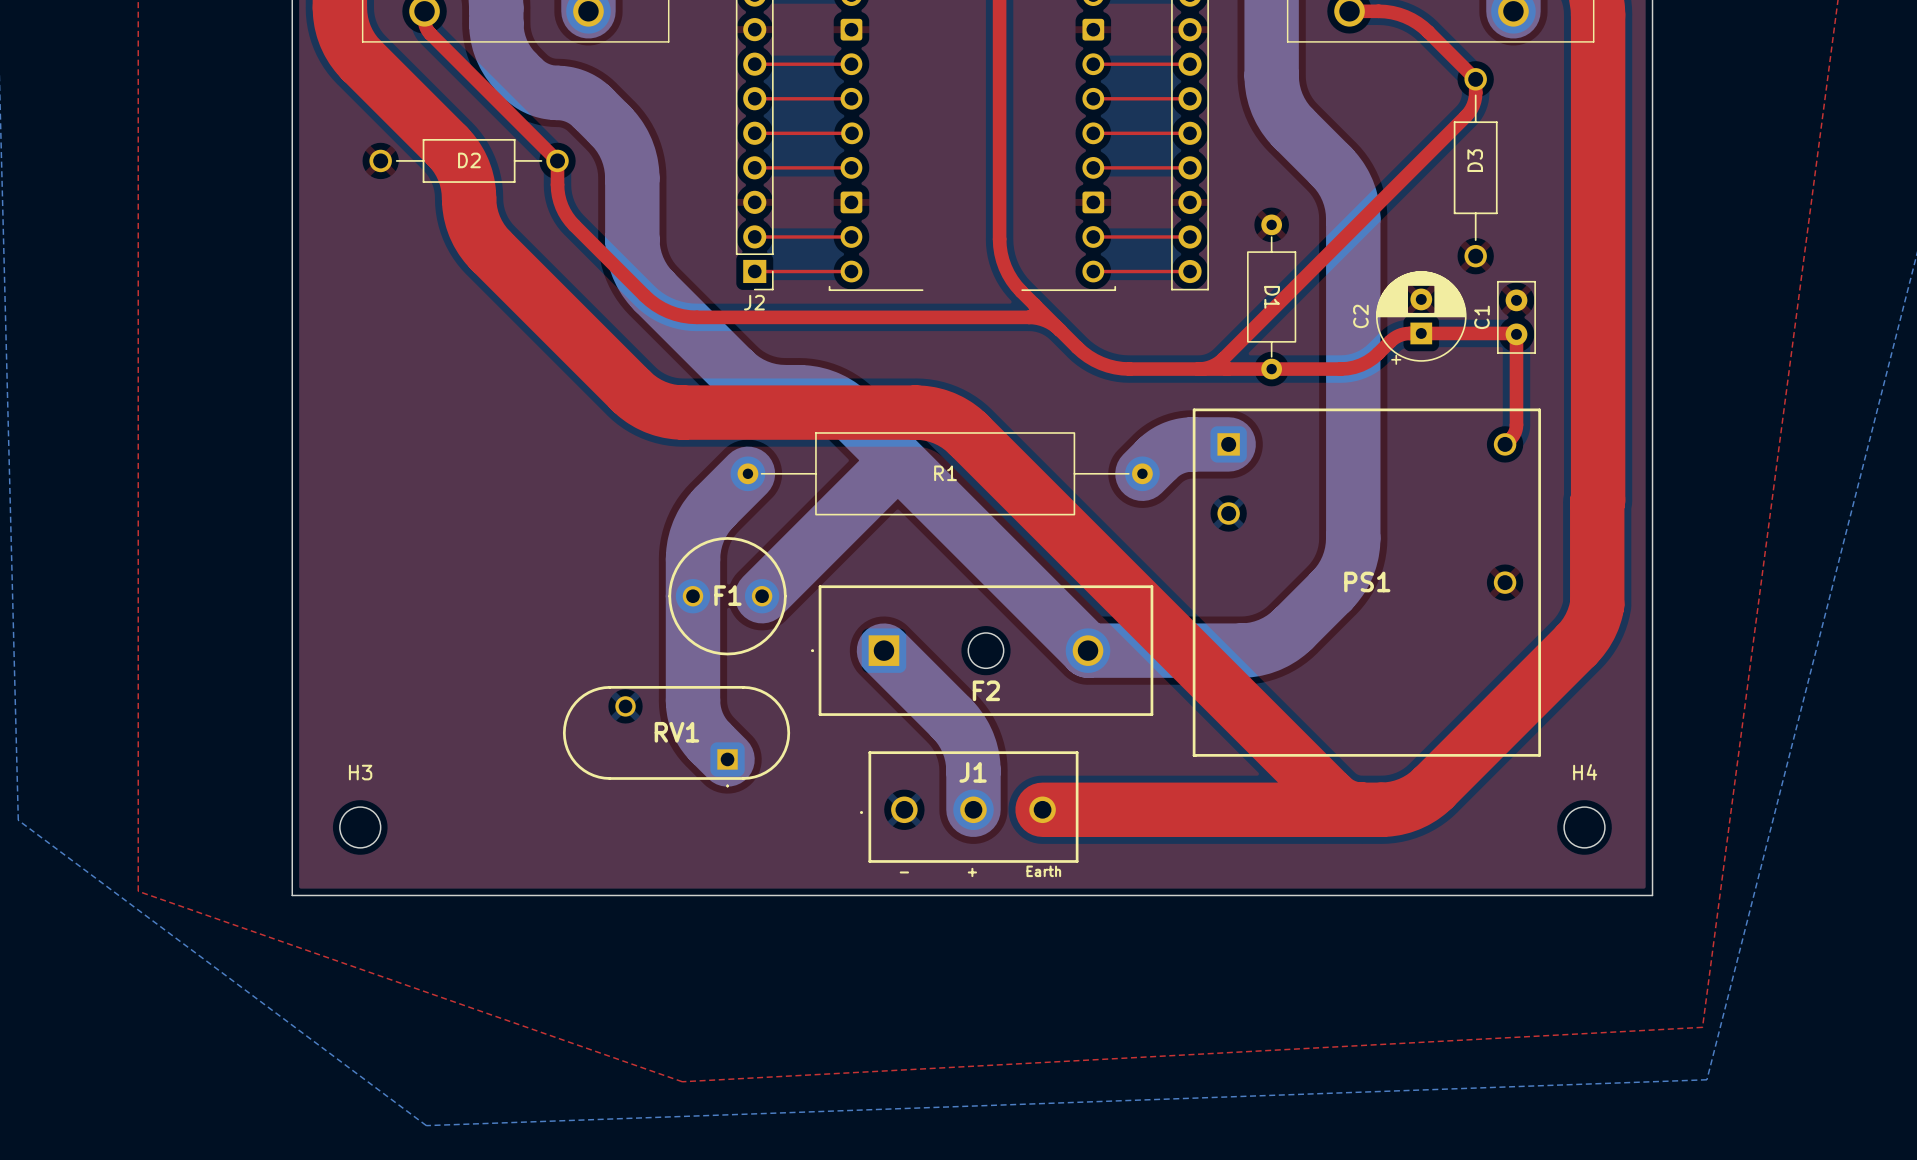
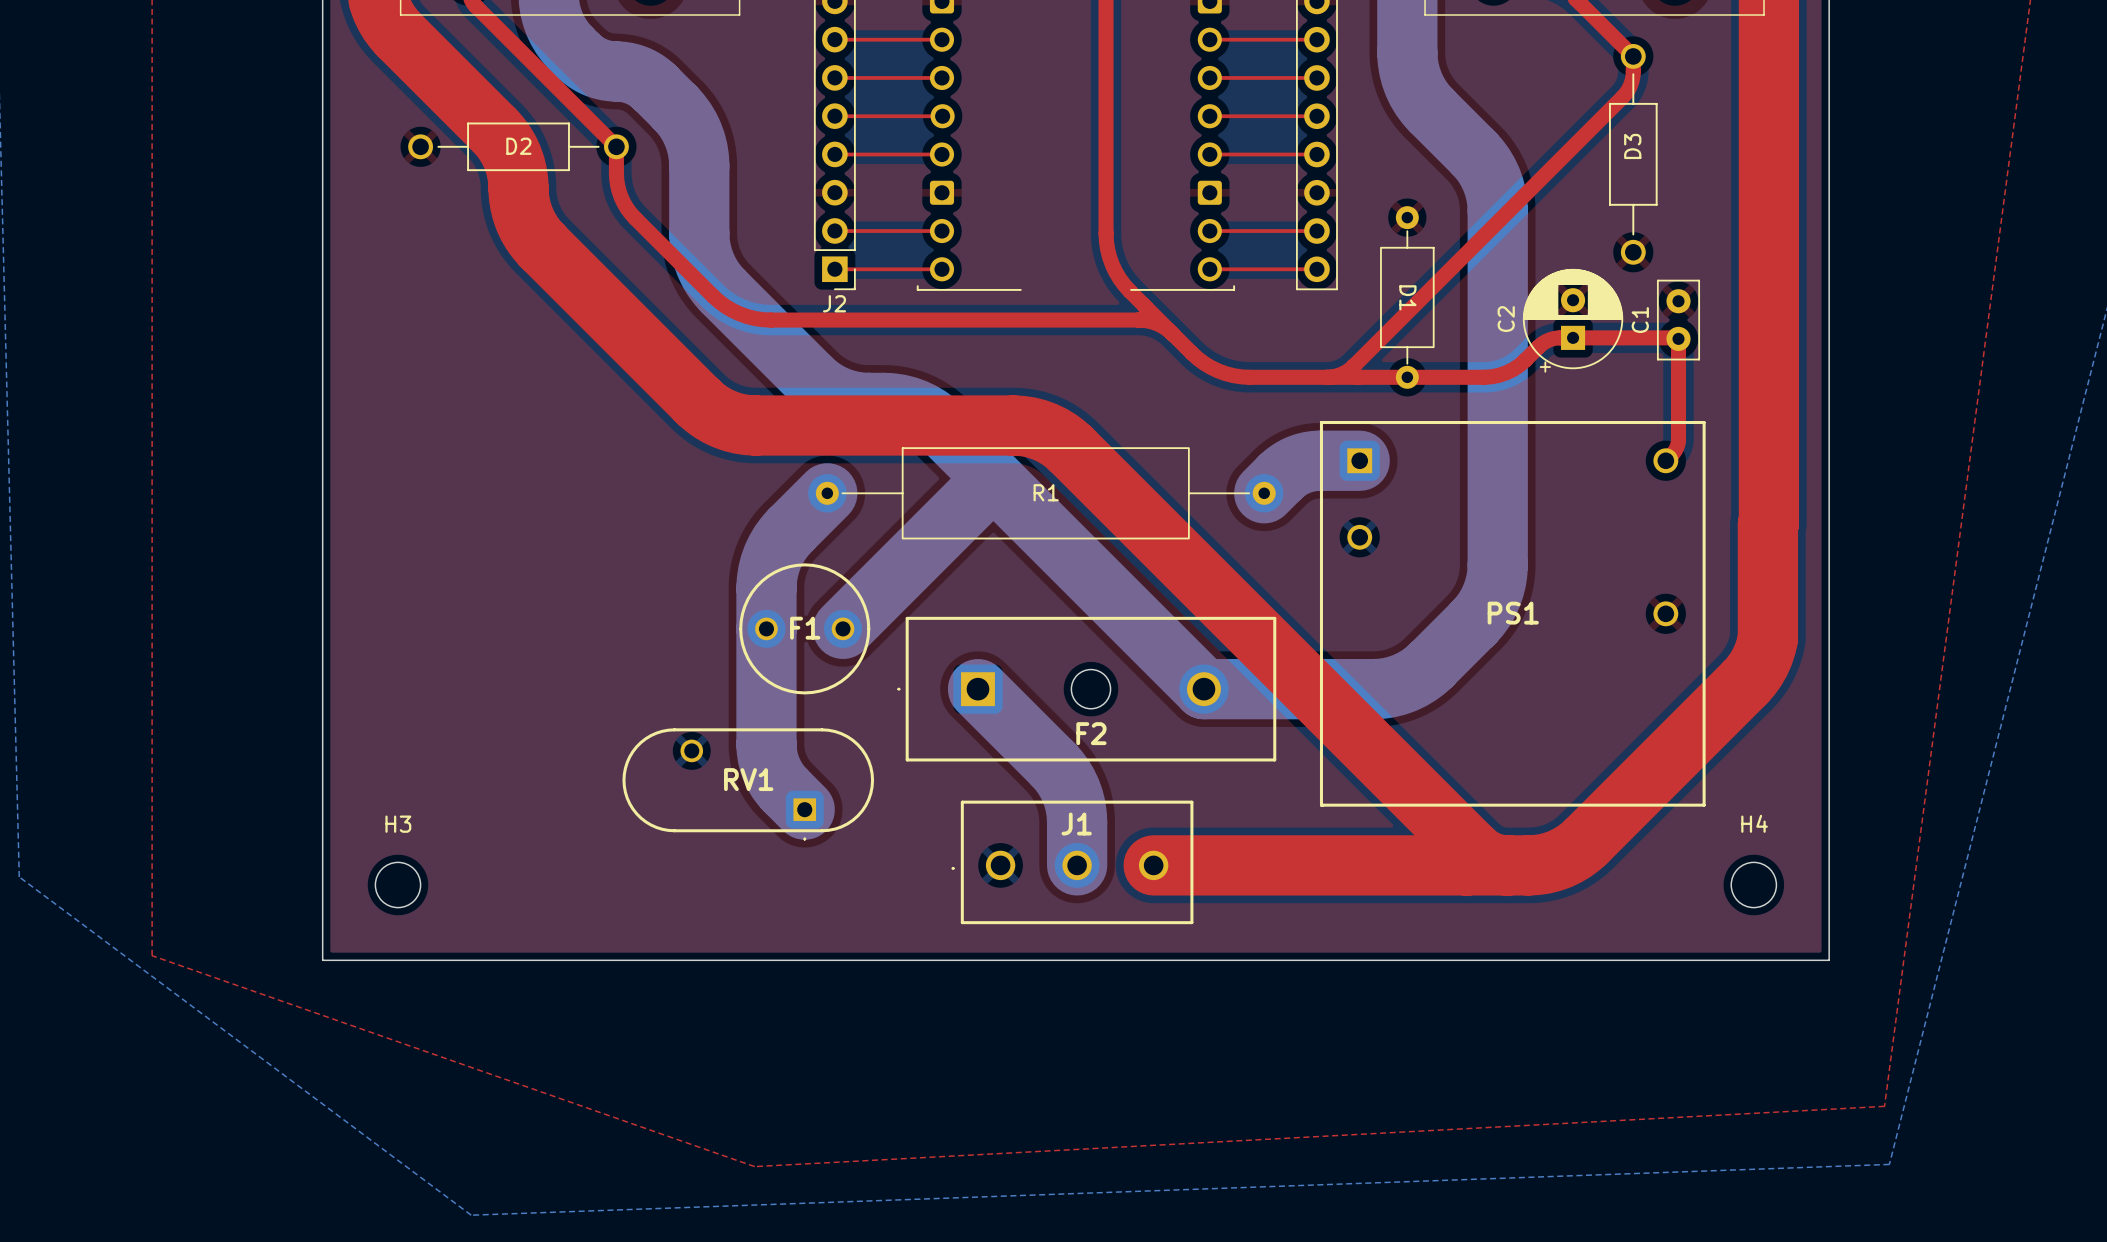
text: Earth (1043, 871) -> none
text: - (904, 872) -> none
text: + (972, 872) -> none

